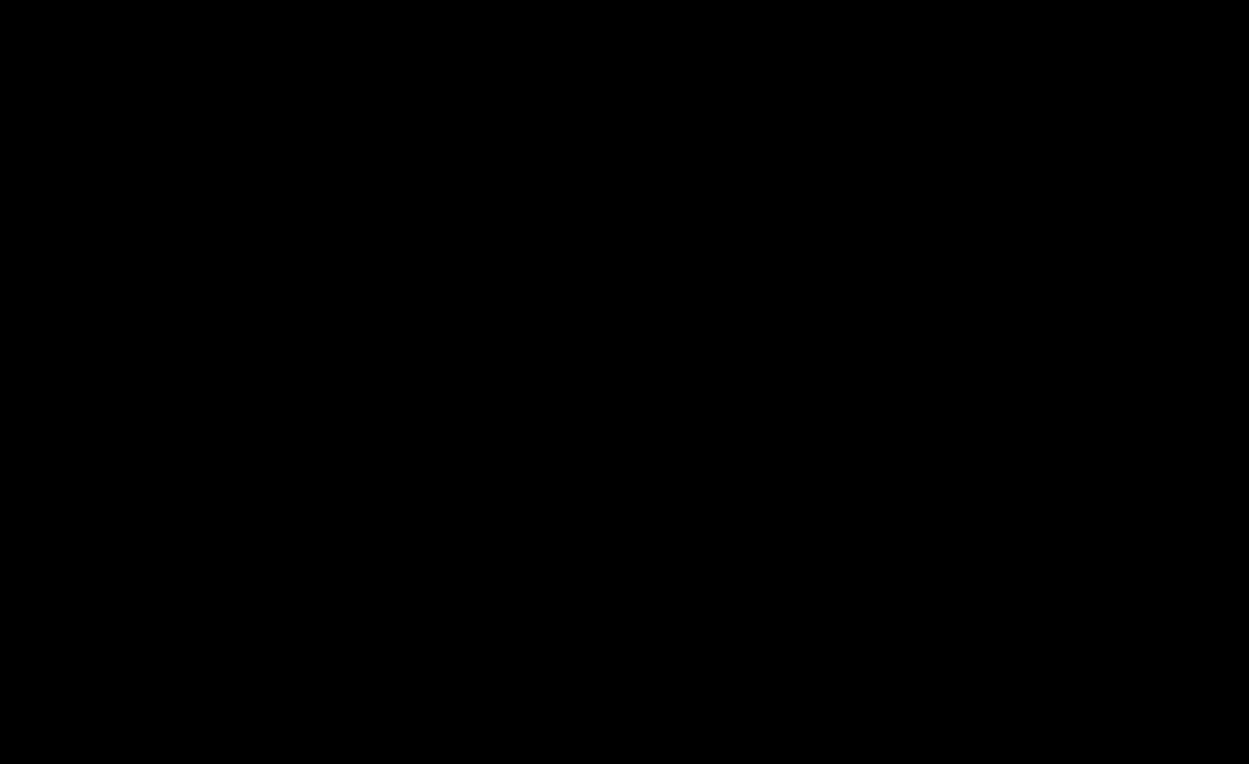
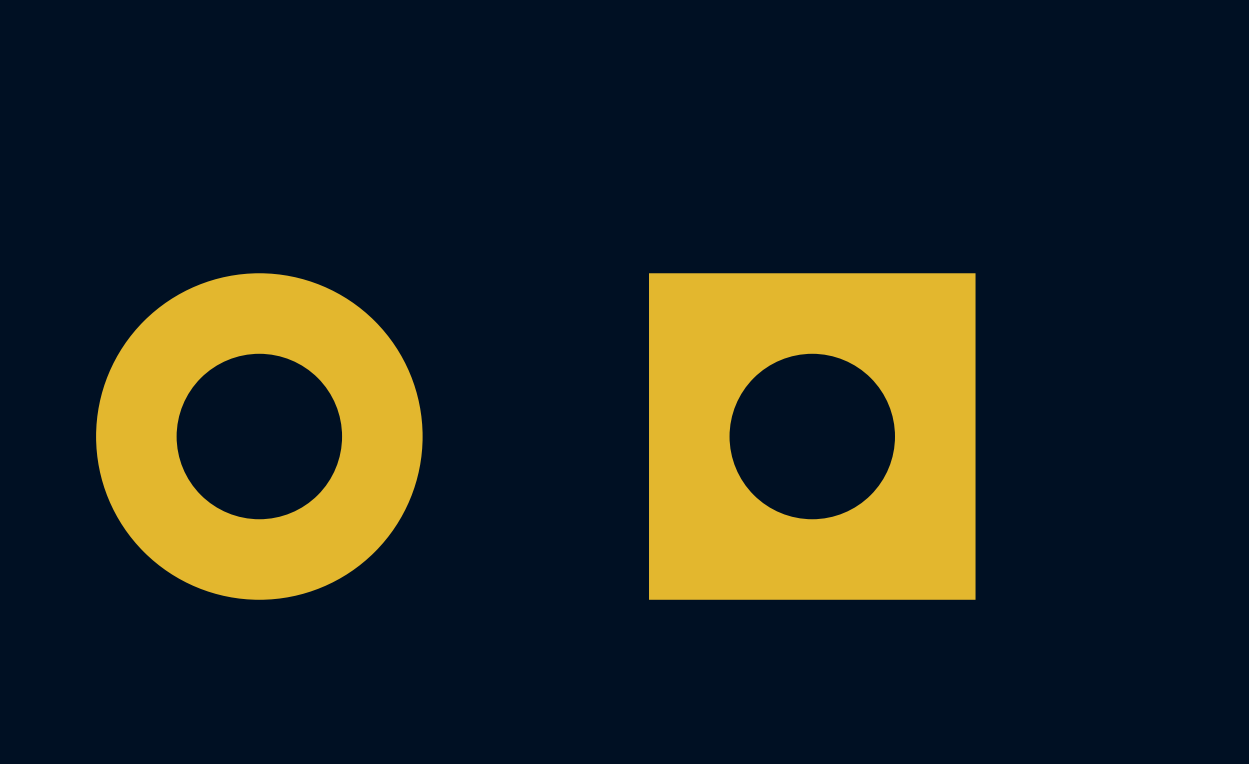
part: none -> (535, 436)

